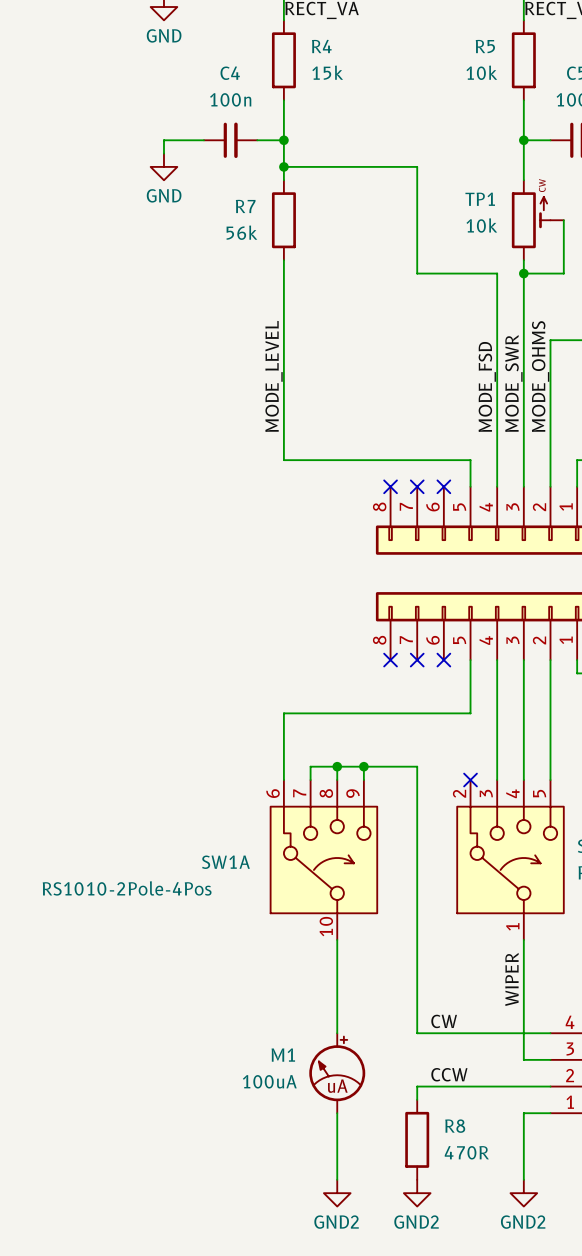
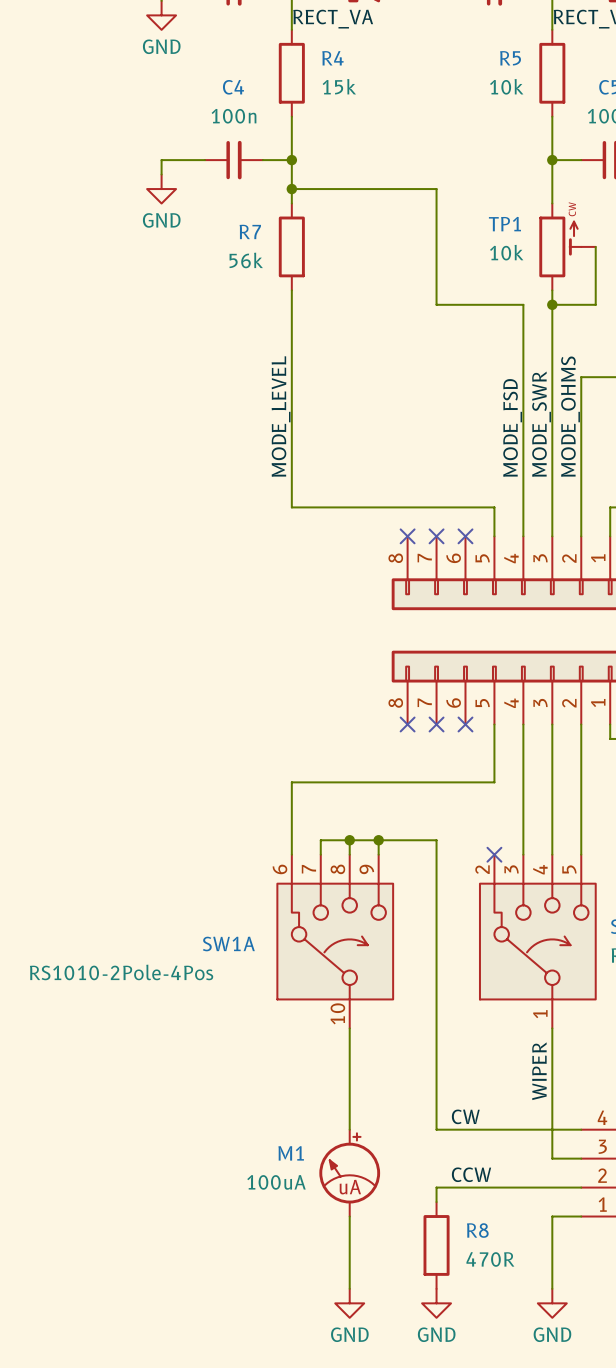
power symbol: GND2 (337, 1193) -> GND (349, 1303)
power symbol: GND2 (417, 1193) -> GND (436, 1303)
power symbol: GND2 (523, 1193) -> GND (552, 1303)

